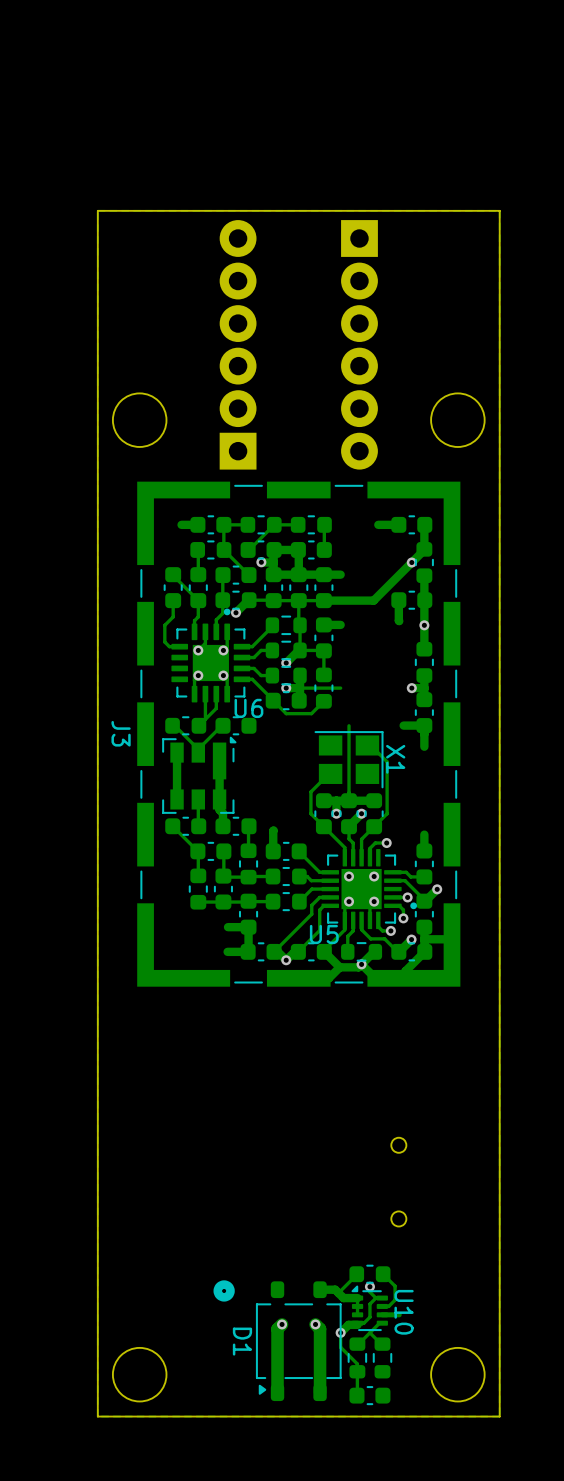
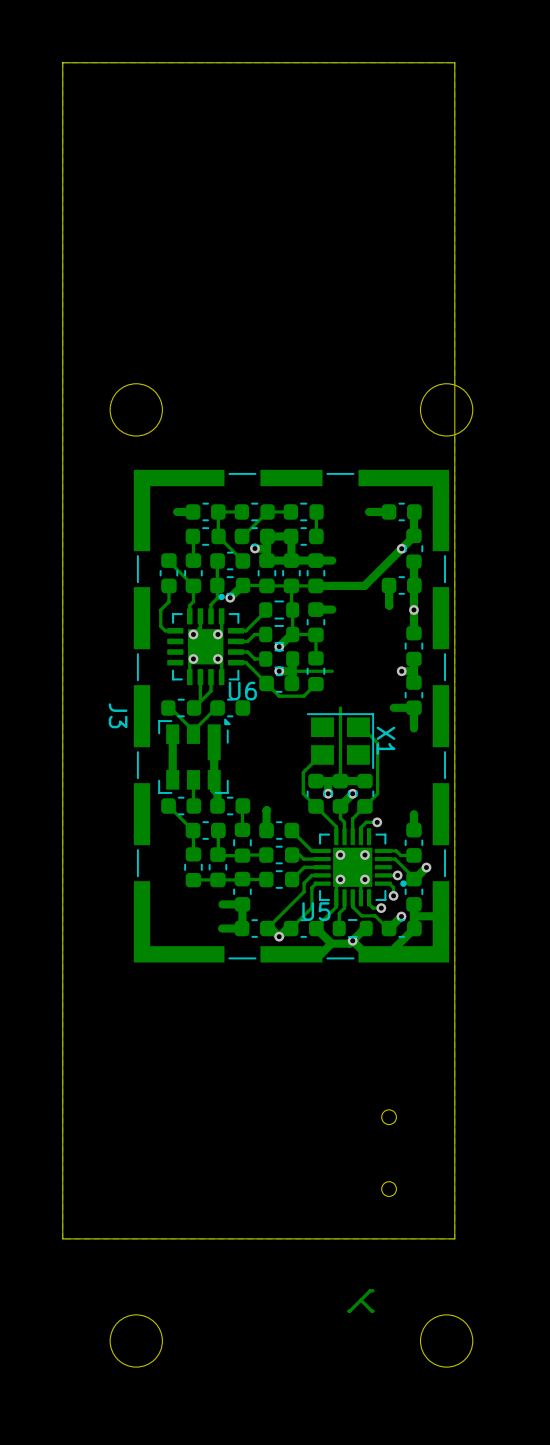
board edge: (499, 210) (97, 210) (97, 1416) (499, 1416) (499, 210) -> (454, 62) (62, 62) (62, 1238) (454, 1238) (454, 62)
part: (238, 344) -> none
part: (359, 344) -> none
track: (356, 1274) (338, 1293) -> none
part: (369, 1274) -> none
track: (383, 1274) (395, 1286) (395, 1300) (388, 1306) (382, 1306) -> none
track: (369, 1286) (369, 1292) (375, 1298) -> none
via: (369, 1286) -> none
track: (320, 1289) (335, 1289) (343, 1298) (357, 1298) (357, 1314) -> none
part: (224, 1290) -> none
track: (375, 1298) (369, 1304) (369, 1317) (363, 1323) (357, 1323) -> none
U10: (369, 1308) -> none
track: (399, 1314) (382, 1314) -> none
track: (282, 1324) (277, 1328) (277, 1392) -> none
via: (282, 1324) -> none
track: (315, 1324) (320, 1328) (320, 1392) -> none
via: (315, 1324) -> none
track: (357, 1324) (348, 1324) (340, 1332) (340, 1347) (357, 1364) (356, 1395) -> none
via: (340, 1332) -> none
D1: (298, 1341) -> none
part: (357, 1357) -> none
part: (382, 1357) -> none
part: (369, 1395) -> none

